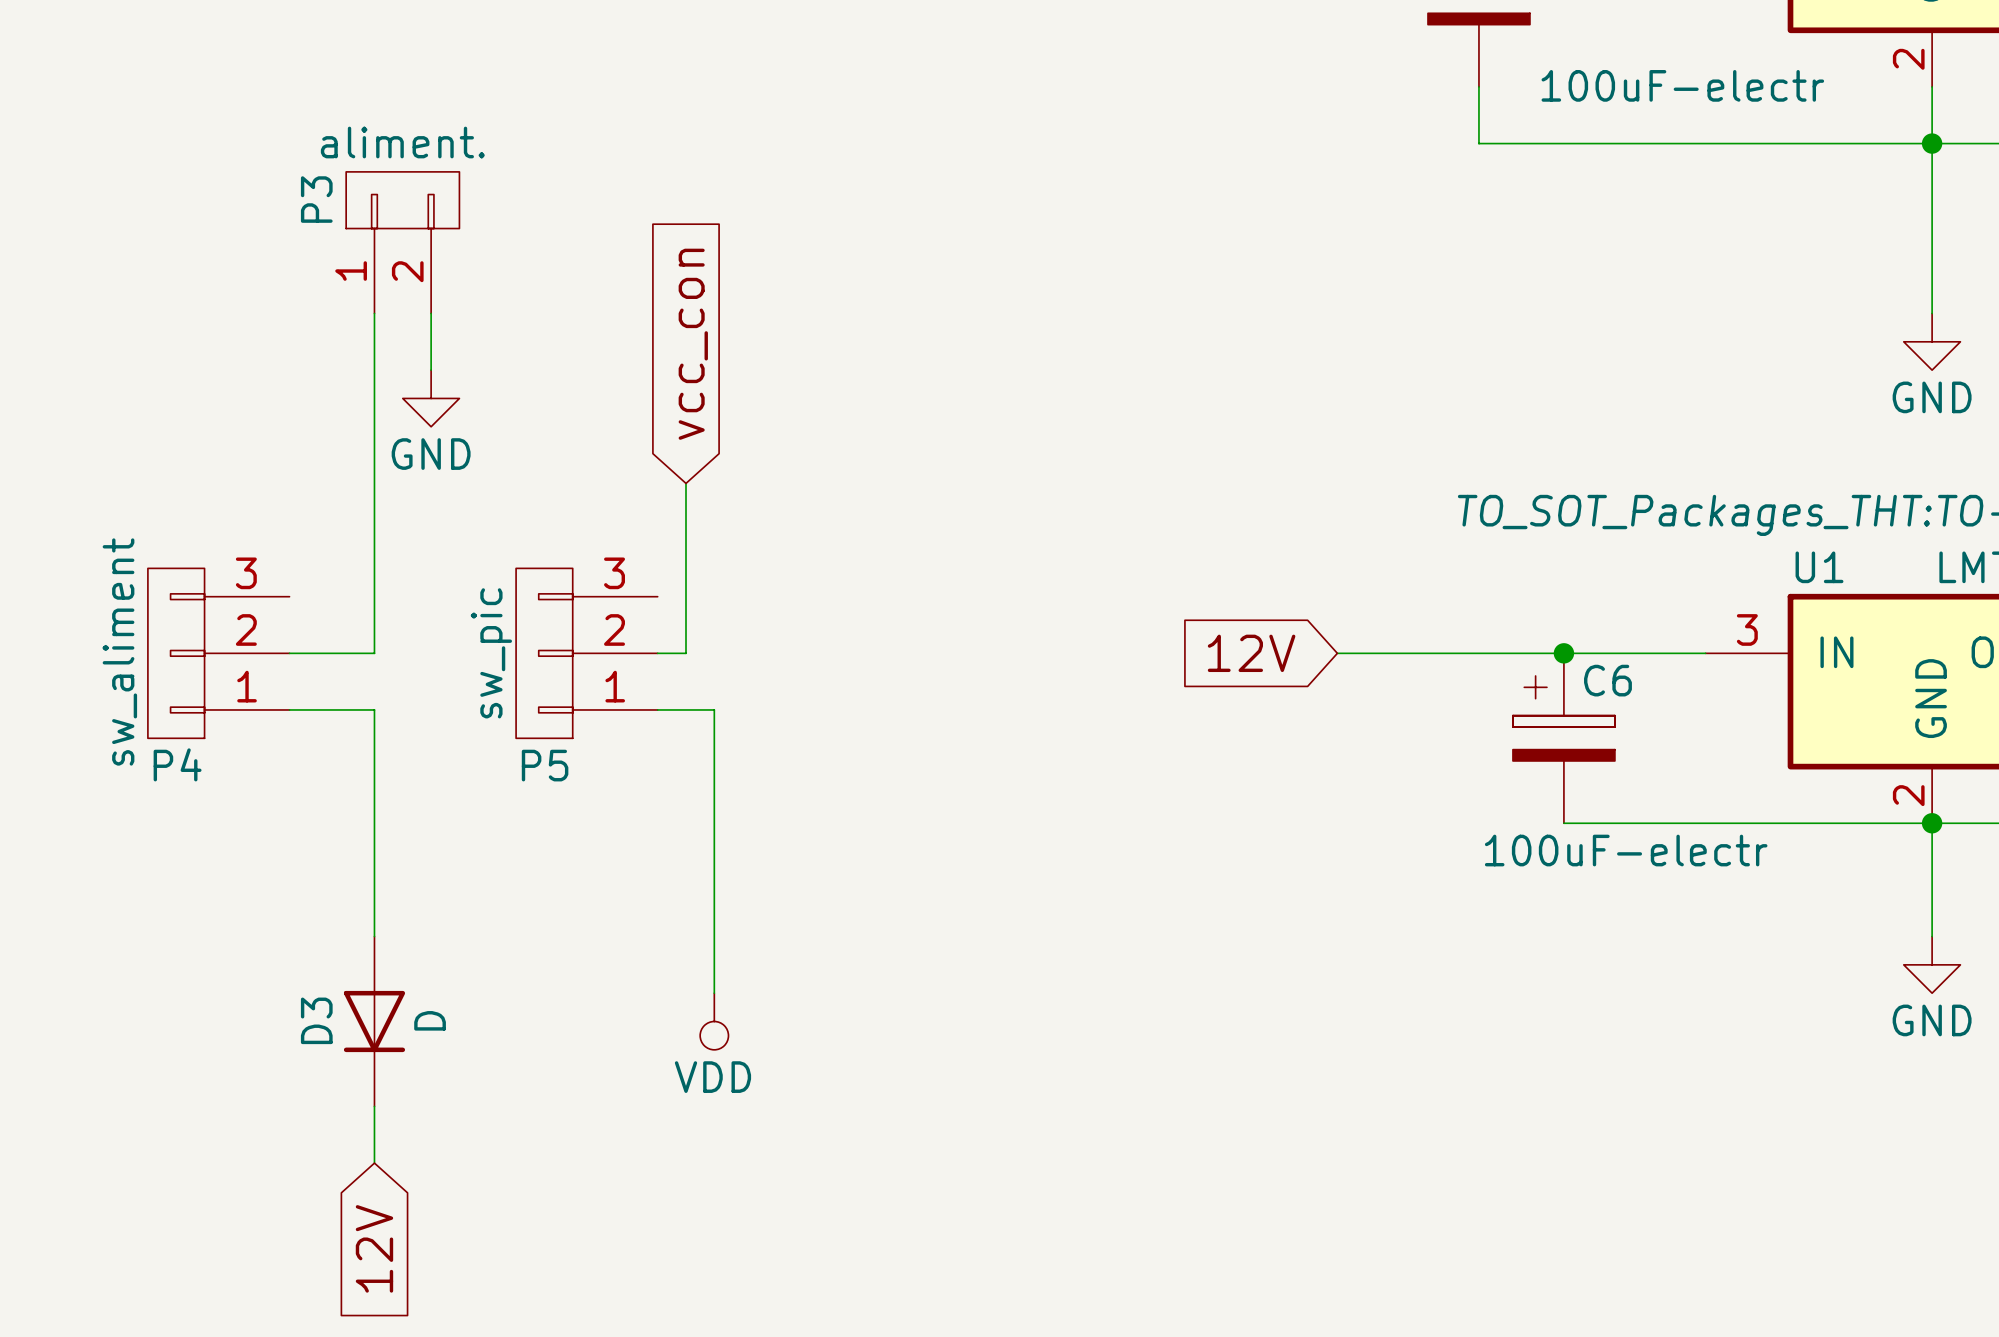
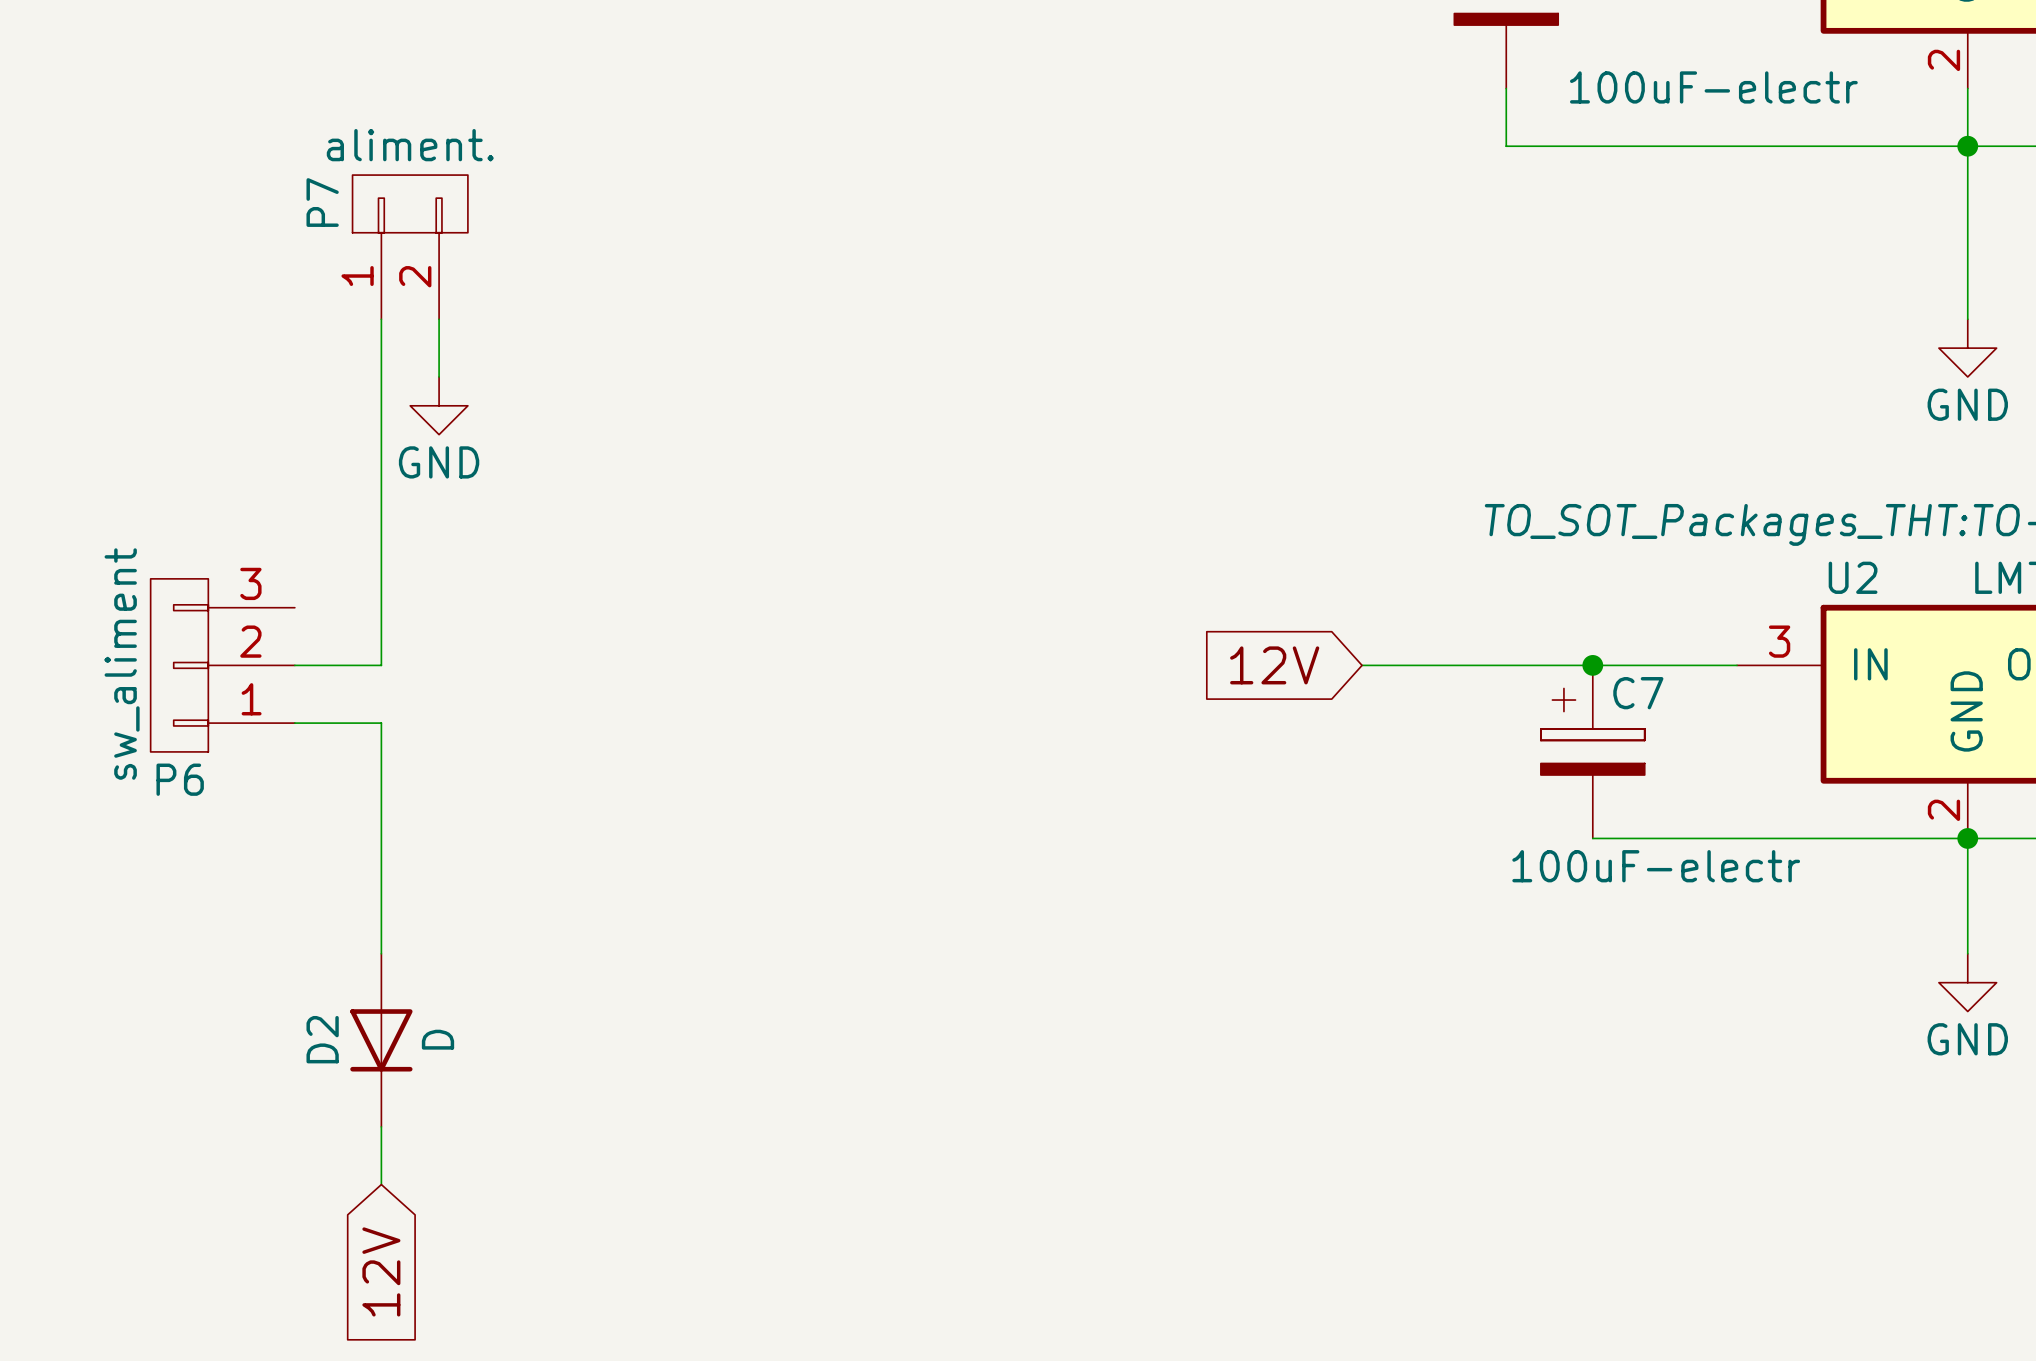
P3 name: P3 (316, 199) -> P7 (322, 202)
global label: vcc_con (693, 344) -> none
wire: (686, 483) (686, 653) (657, 653) -> none
U1 name: U1 (1819, 567) -> U2 (1853, 577)
P5: sw_pic (586, 653) -> none
C6 name: C6 (1607, 680) -> C7 (1638, 693)
wire: (657, 709) (714, 709) (714, 993) -> none
P4 name: P4 (177, 764) -> P6 (180, 779)
D3 name: D3 (316, 1020) -> D2 (322, 1039)
power symbol: VDD (714, 1021) -> none

